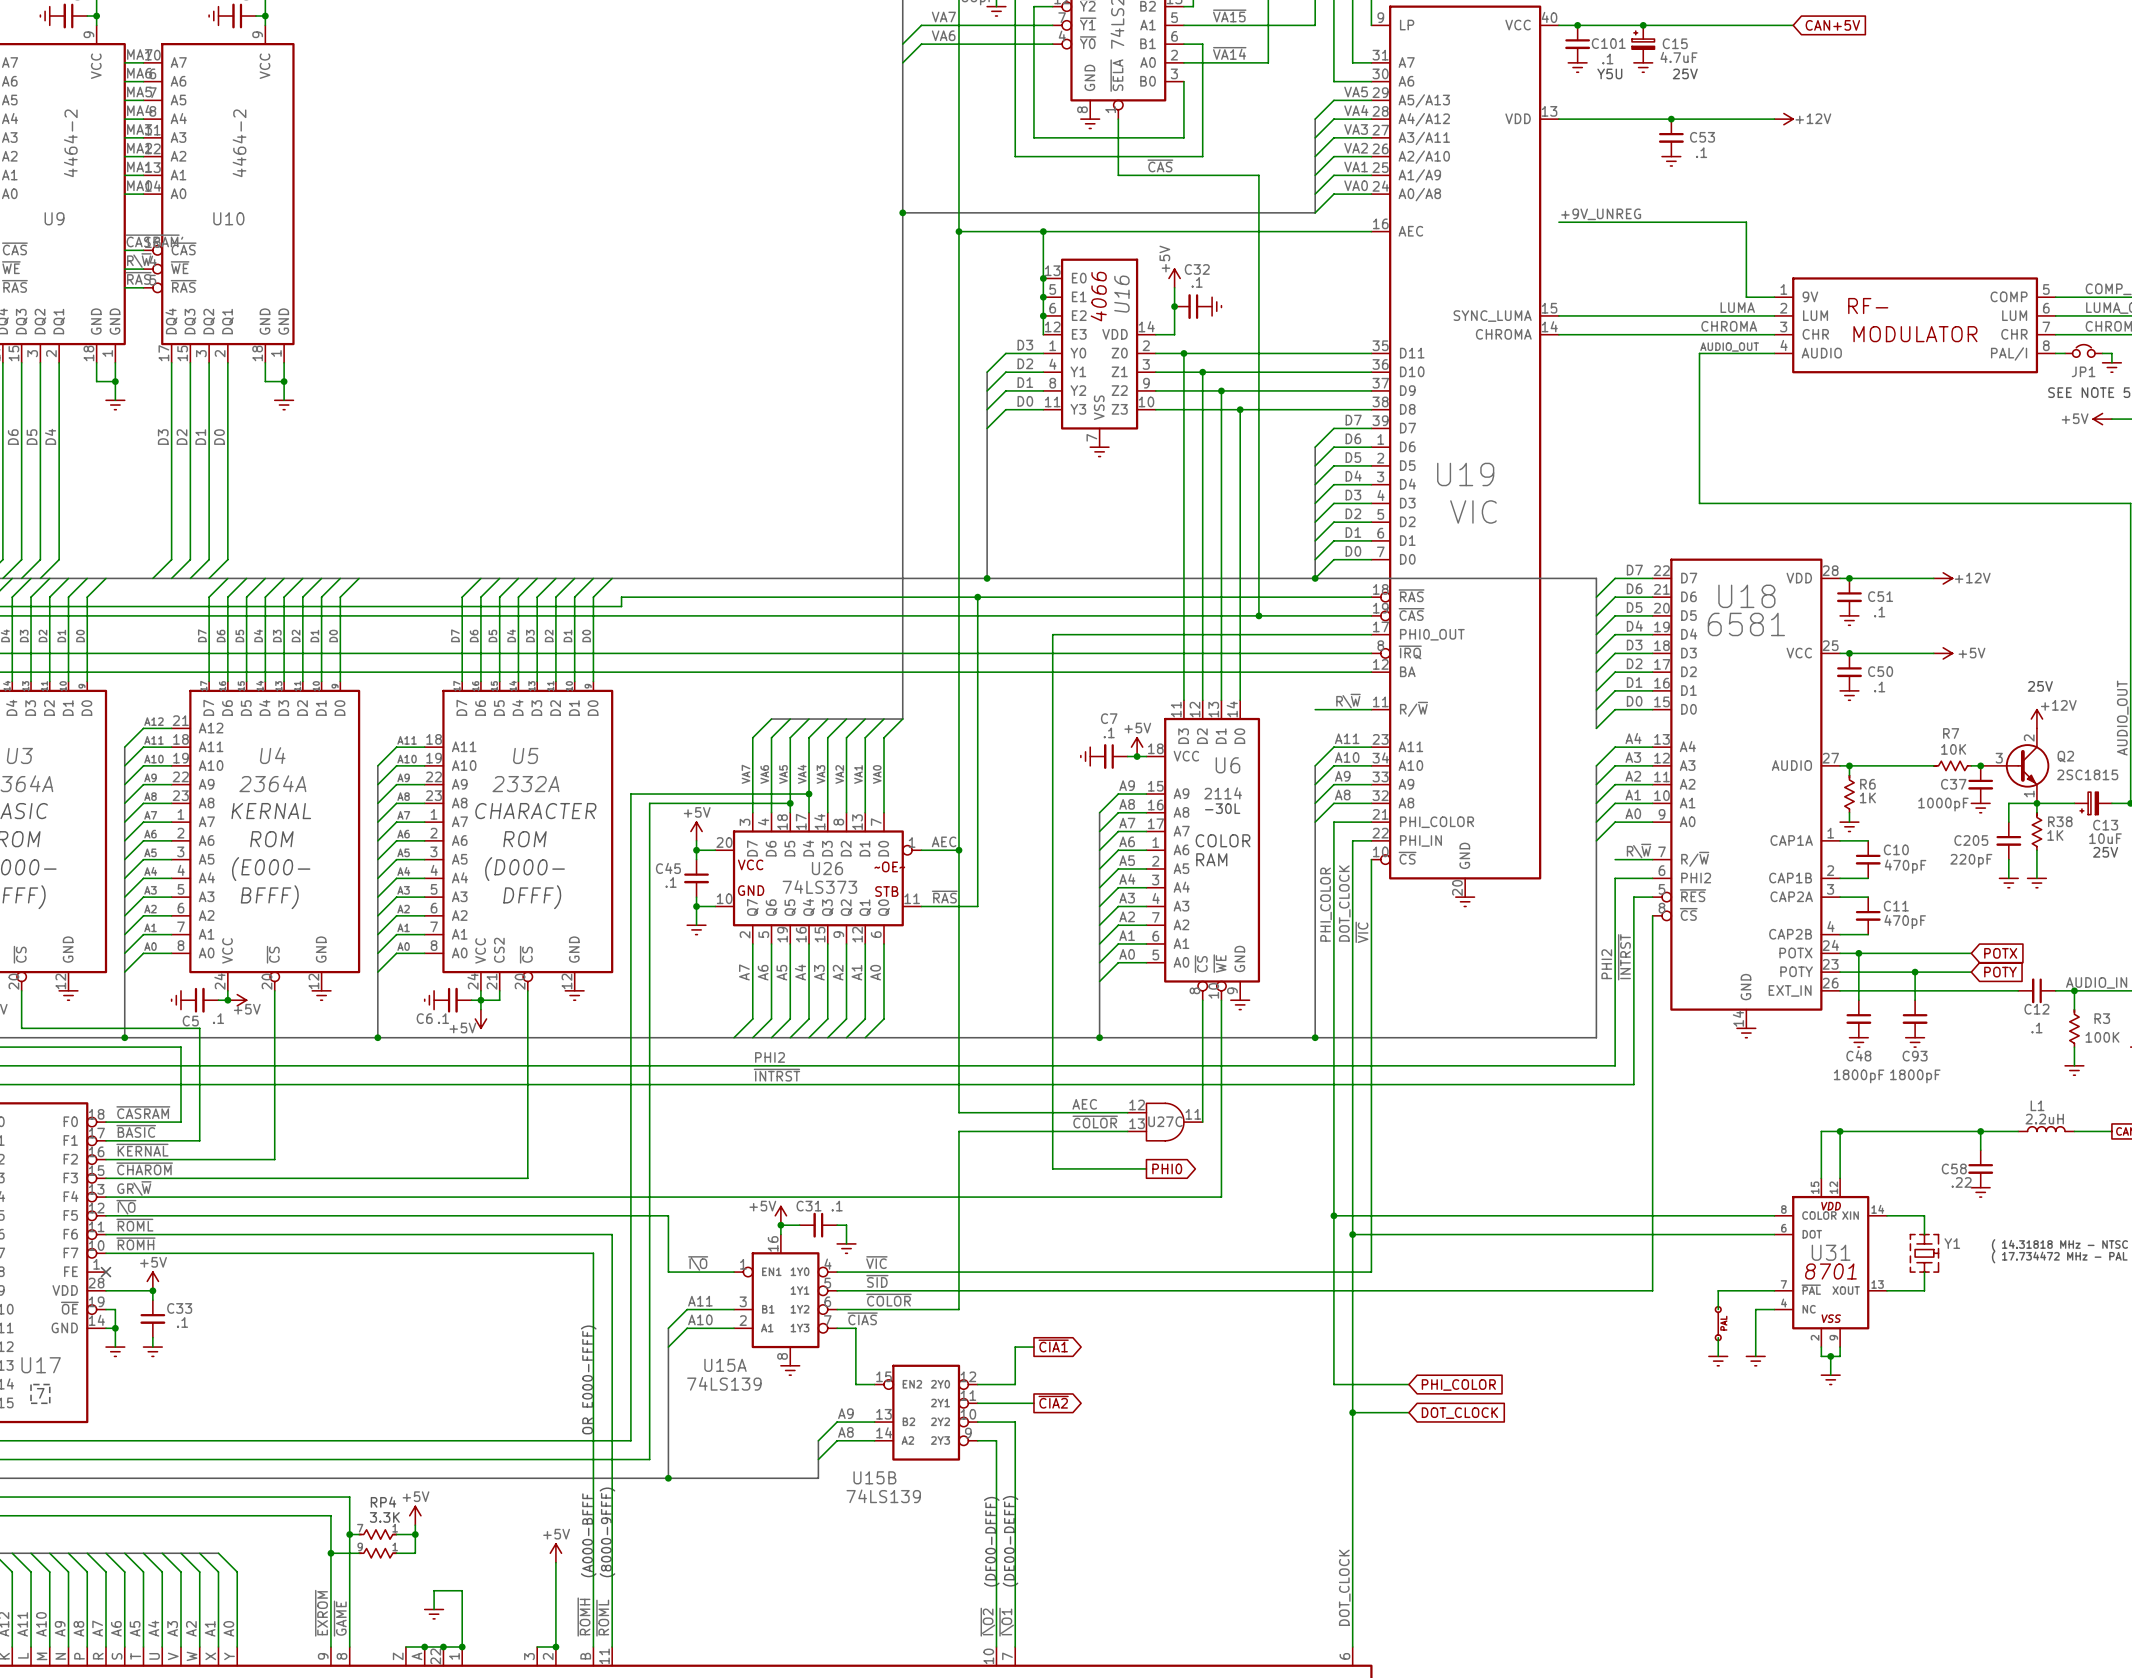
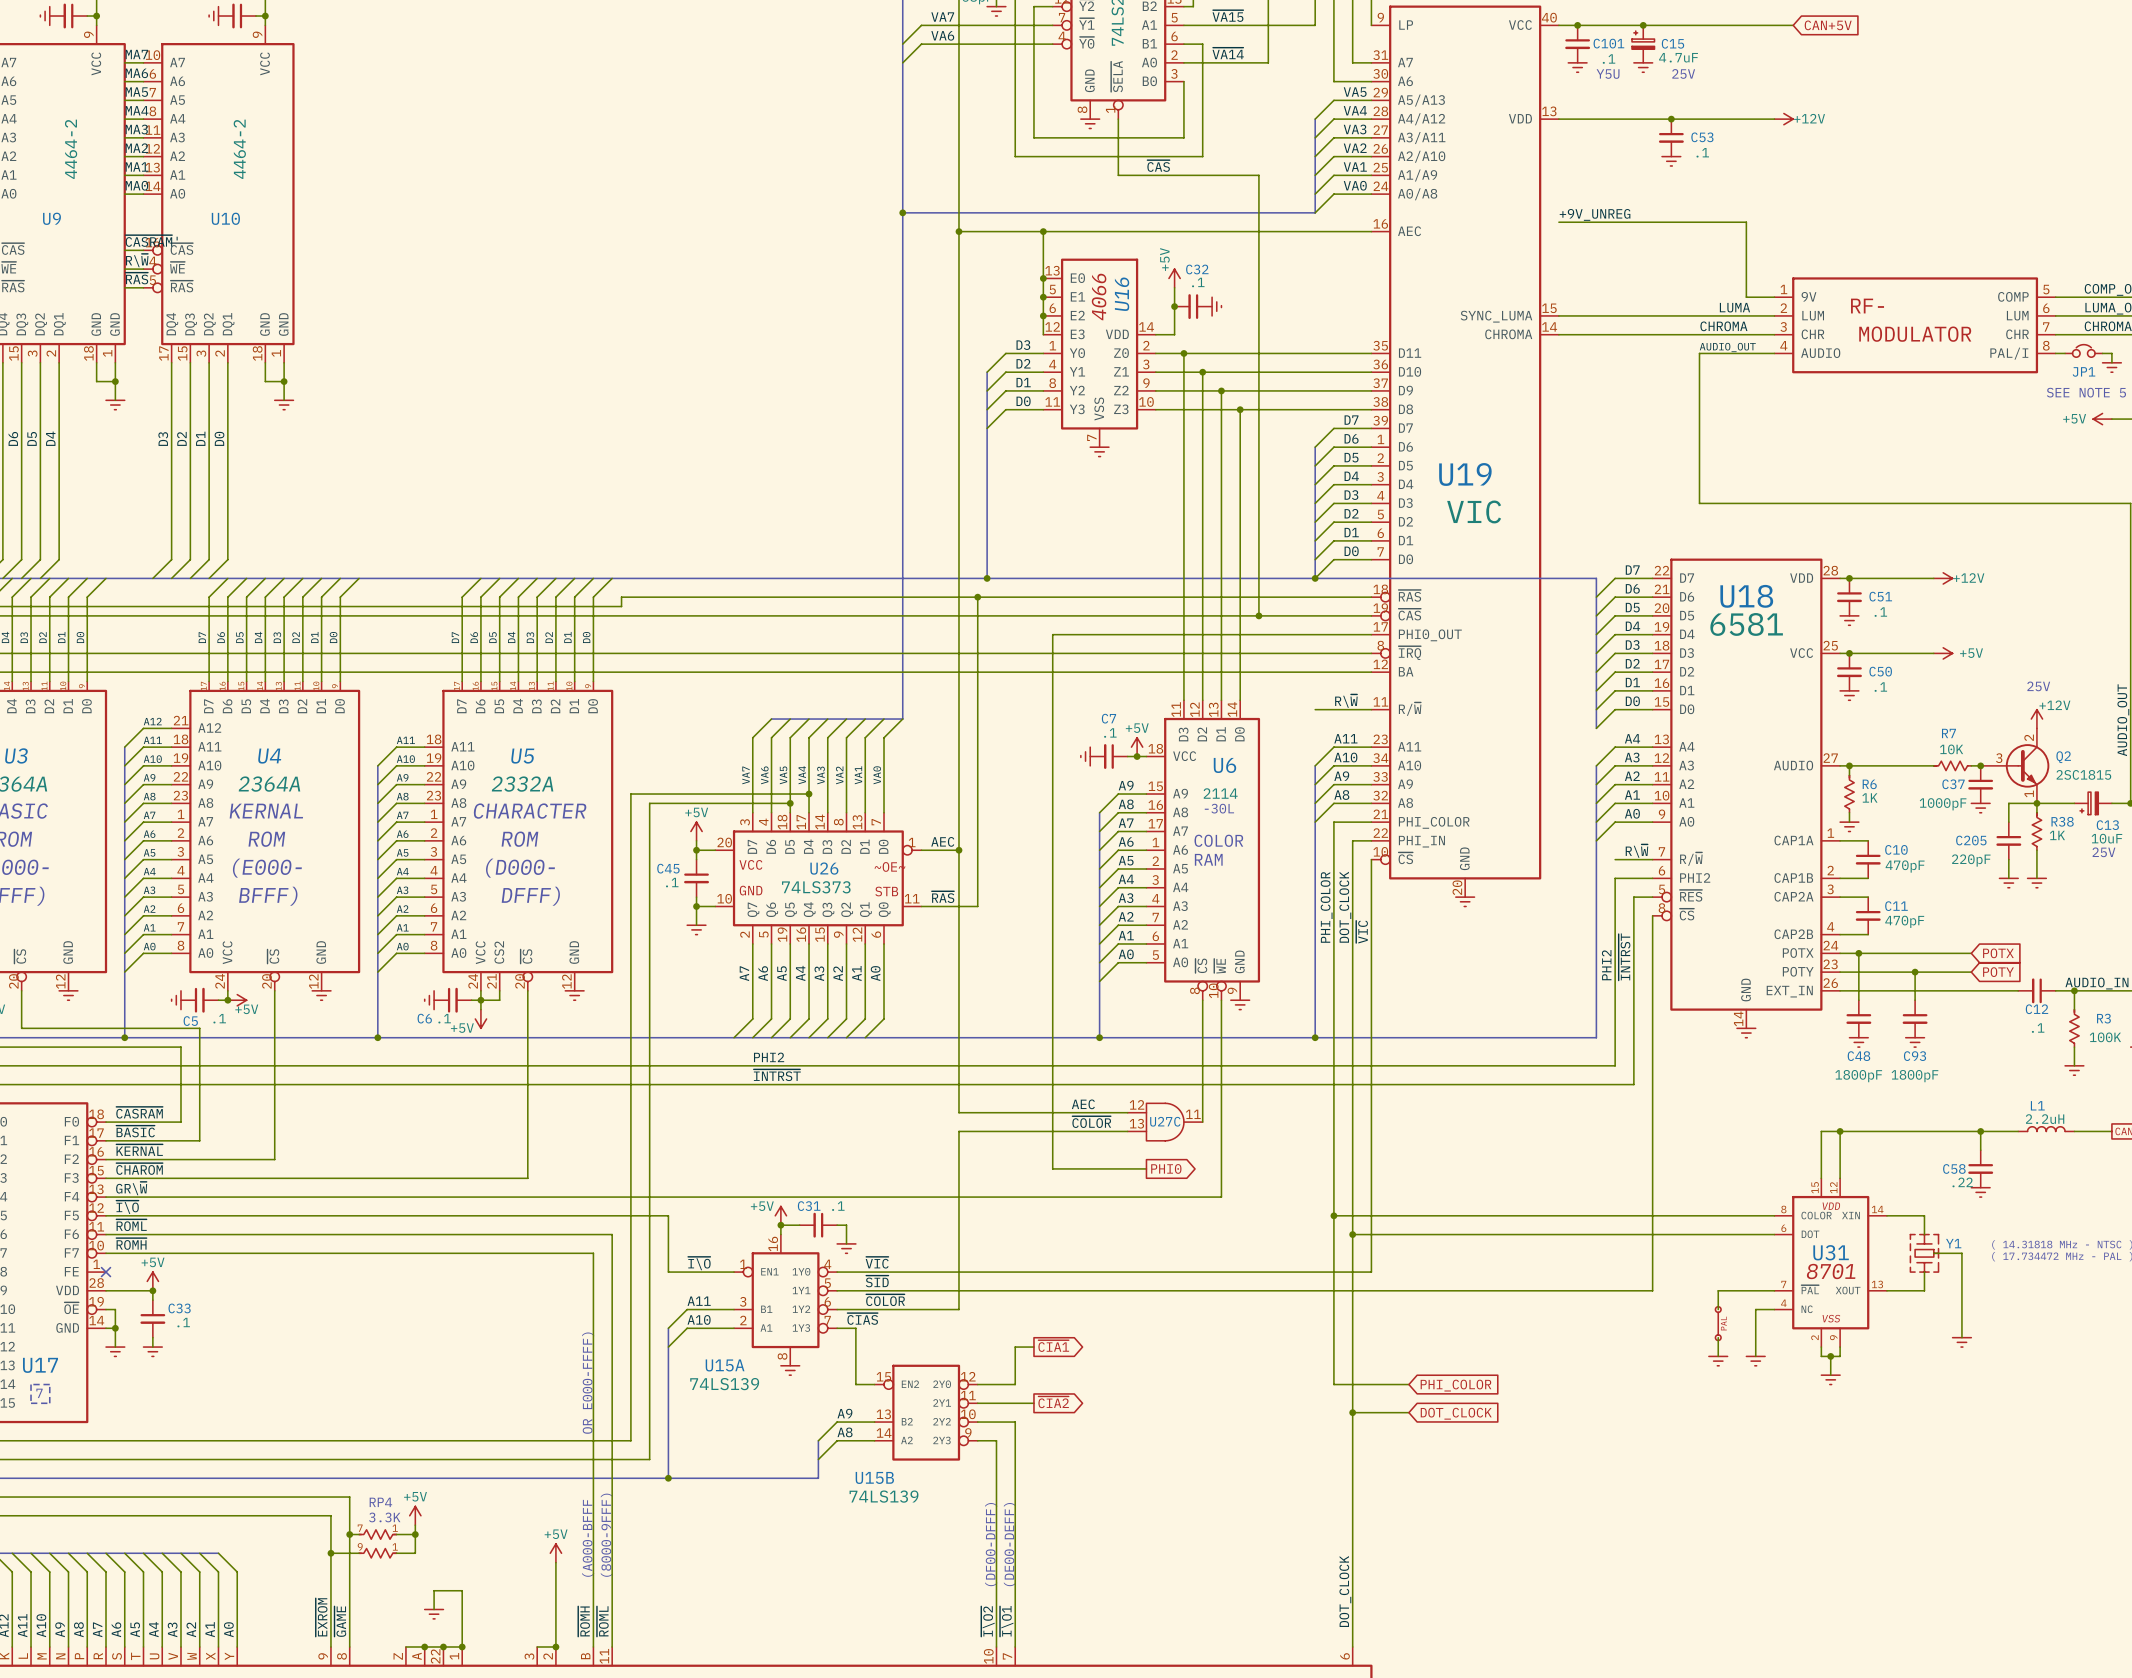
wire: none -> (1933, 1253) (1961, 1253) (1961, 1337)
power symbol: none -> (1961, 1342)

